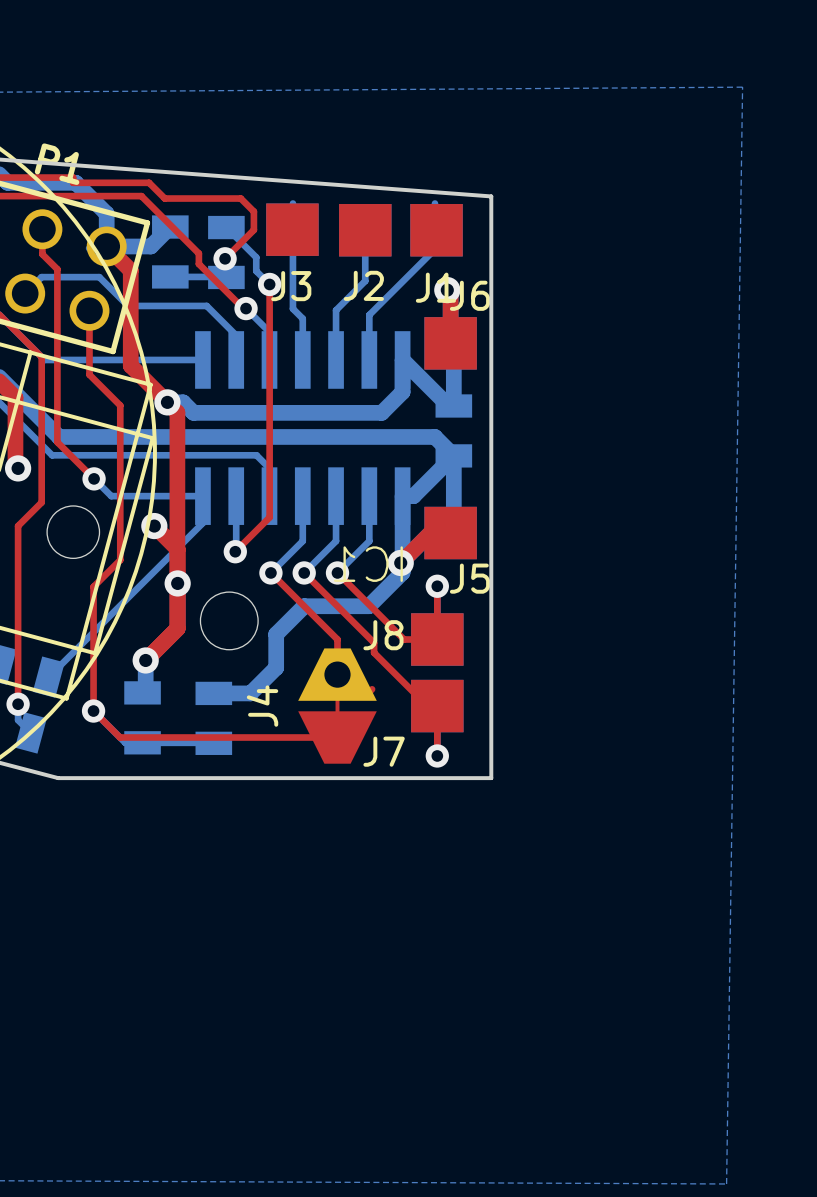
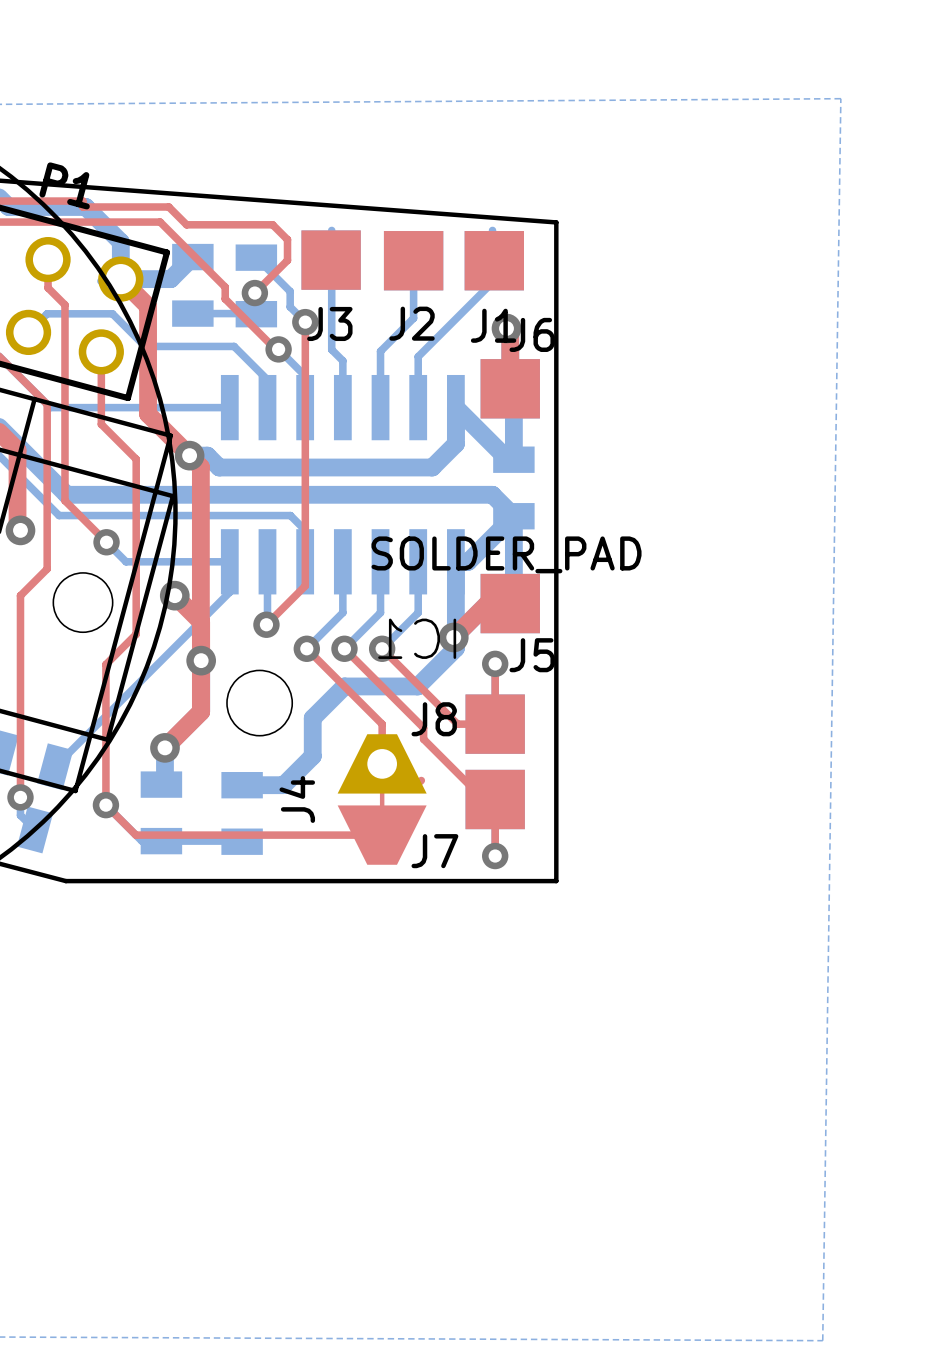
J5 value: none -> SOLDER_PAD (506, 554)

